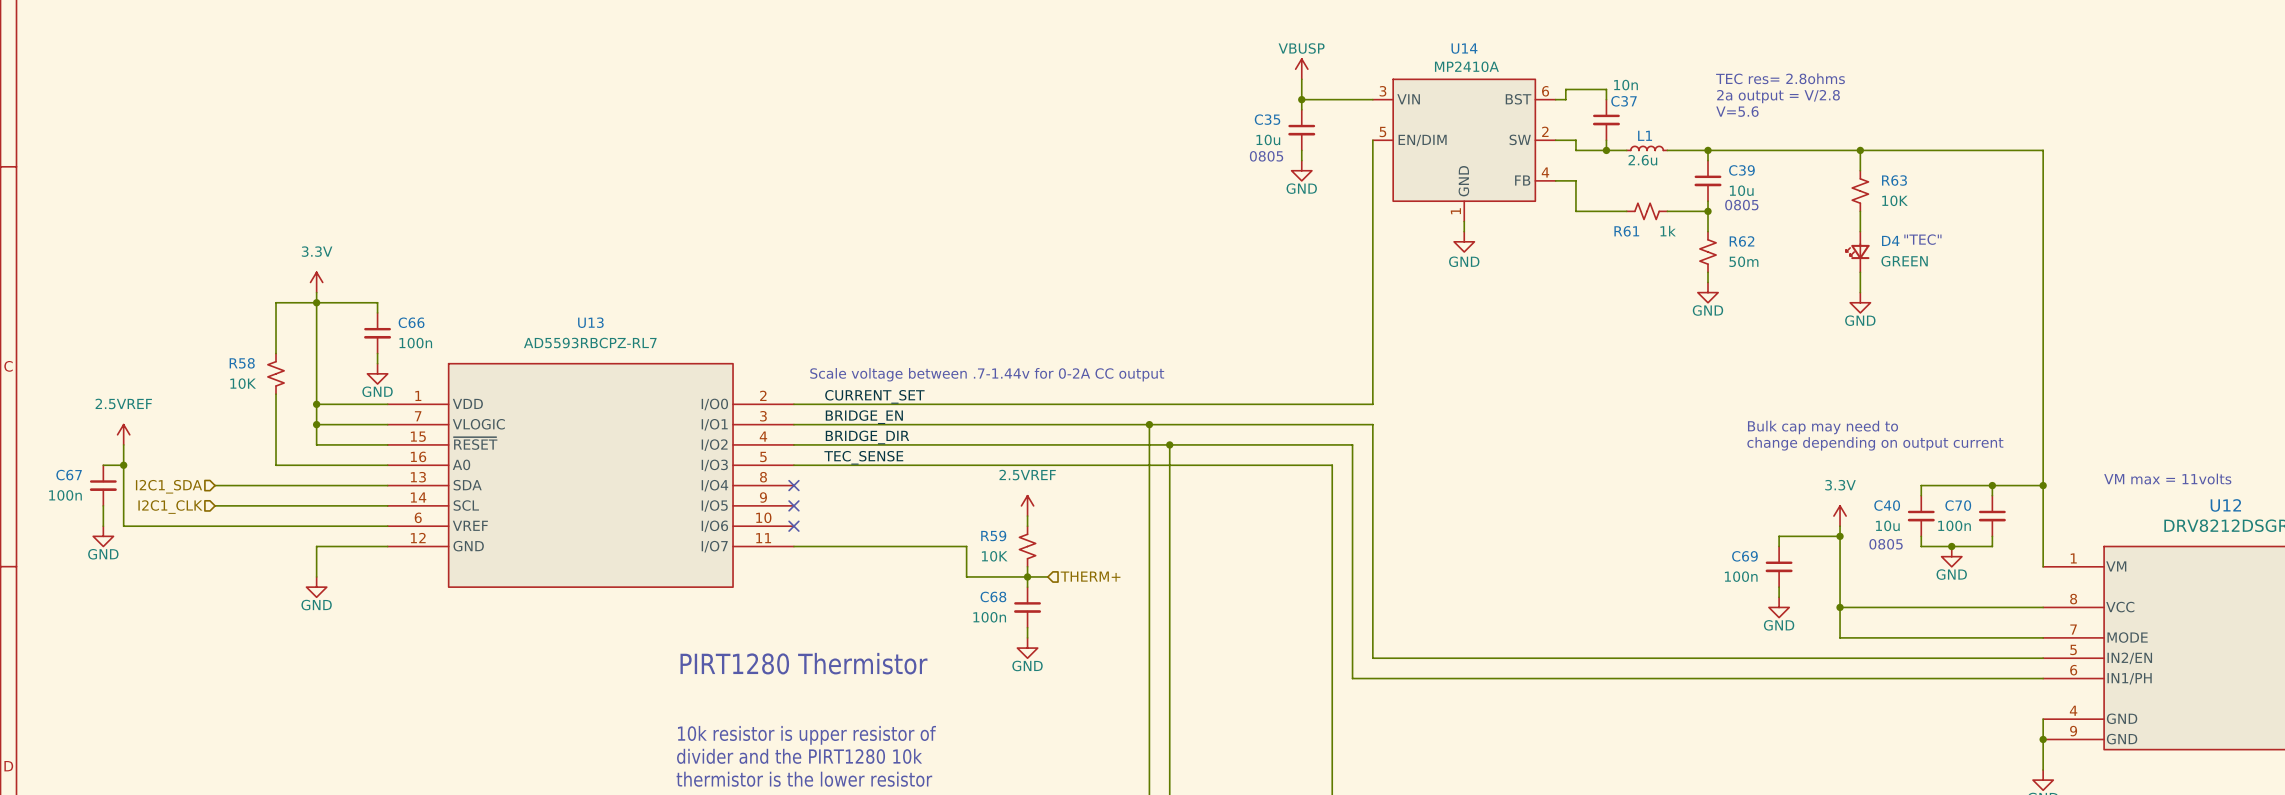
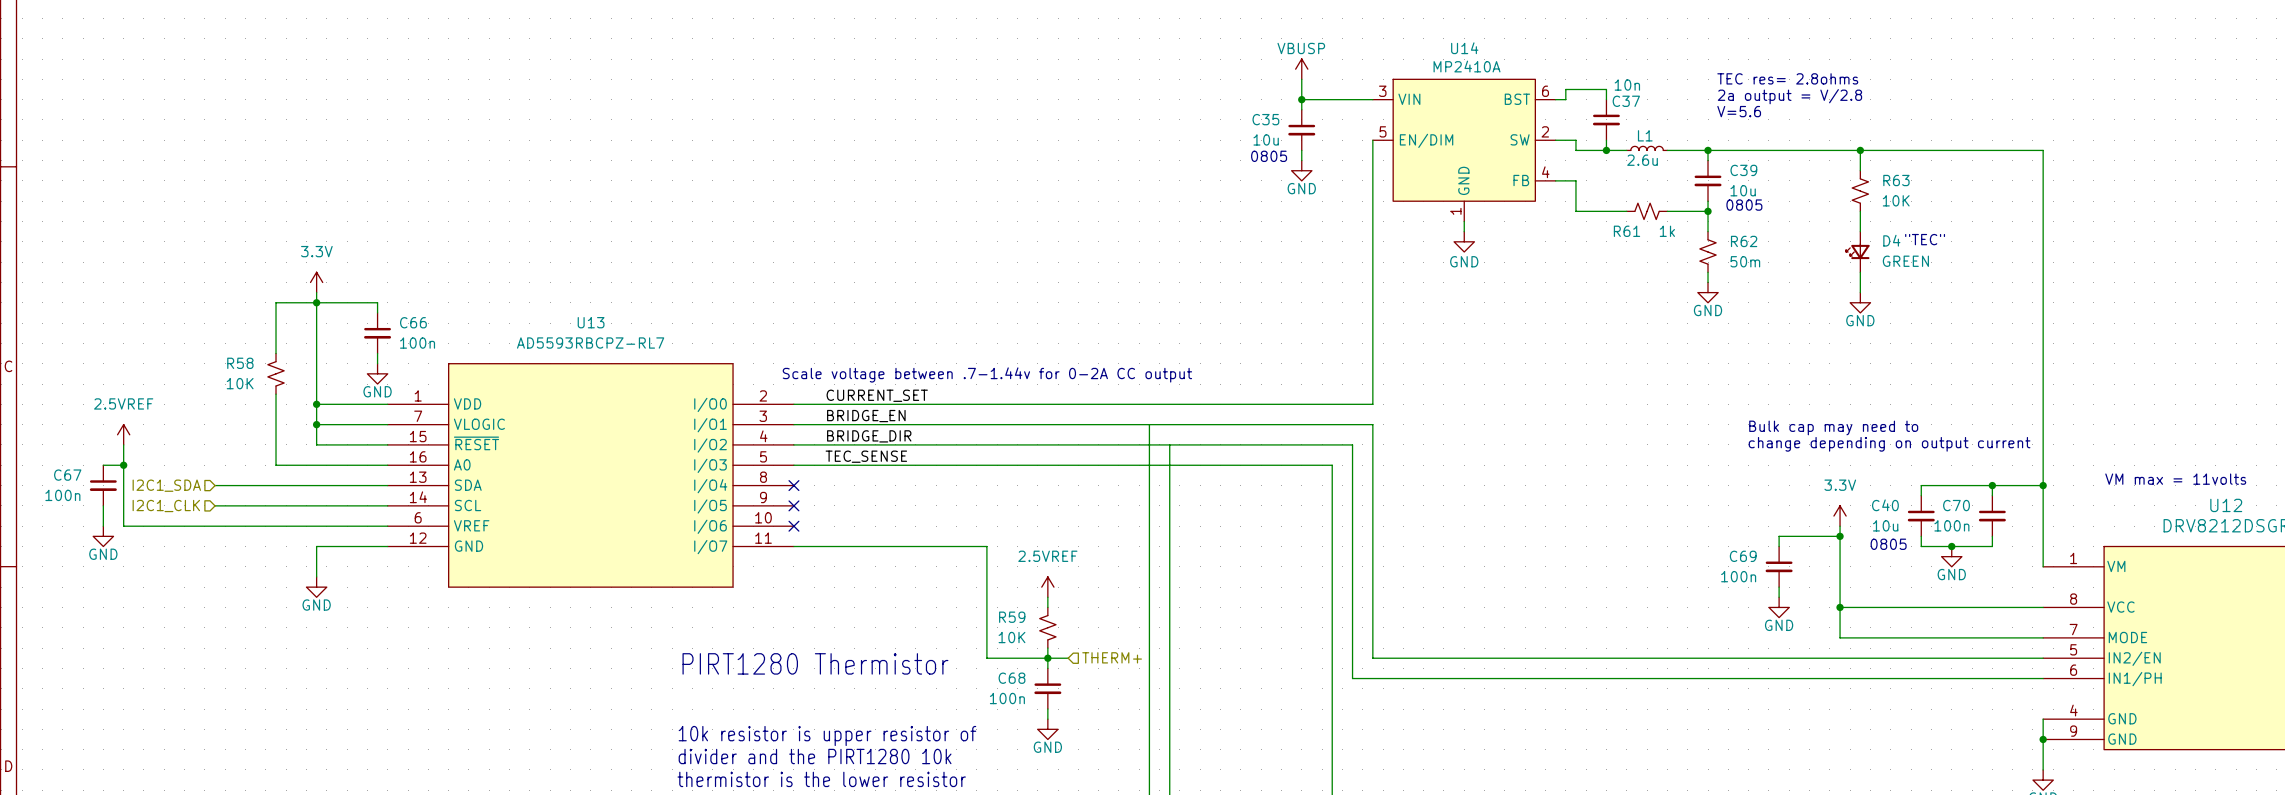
junction: (1149, 424) -> none
junction: (1169, 444) -> none
power symbol position: 2.5VREF (1027, 505) -> 2.5VREF (1047, 587)
wire: (1027, 516) (1027, 526) -> (1047, 597) (1047, 607)
wire: (966, 546) (966, 576) (1047, 576) -> (966, 546) (986, 546) (986, 658) (1068, 658)
R59 position: (1027, 546) -> (1047, 627)
wire: (1027, 566) (1027, 587) -> (1047, 648) (1047, 668)
junction: (1027, 576) -> none
hierarchical label position: THERM+ (1090, 576) -> THERM+ (1112, 657)
C68 position: (1027, 607) -> (1047, 688)
wire: (1027, 627) (1027, 637) -> (1047, 709) (1047, 719)
power symbol position: GND (1027, 648) -> GND (1047, 729)
junction: none -> (1047, 658)

